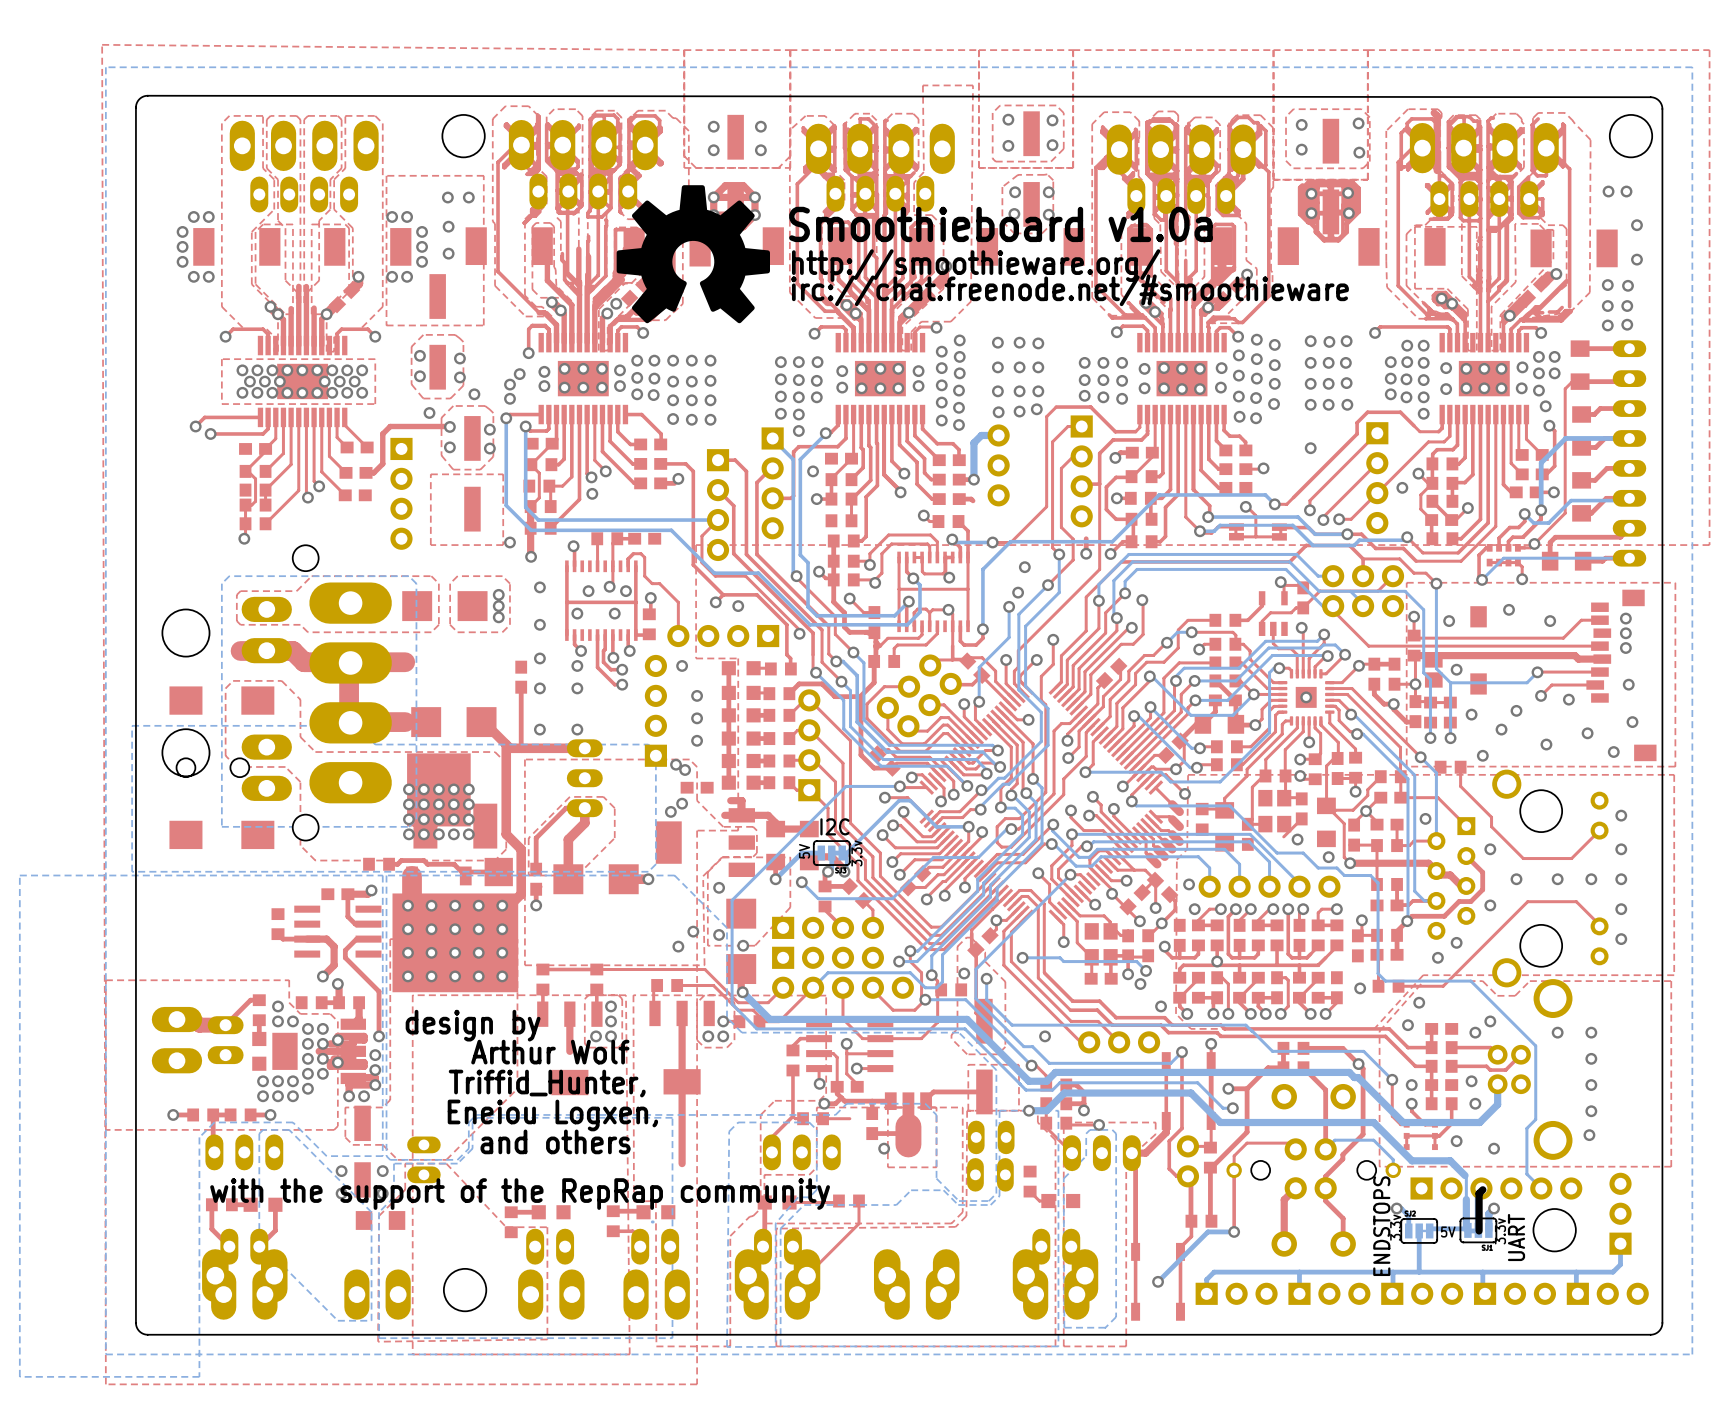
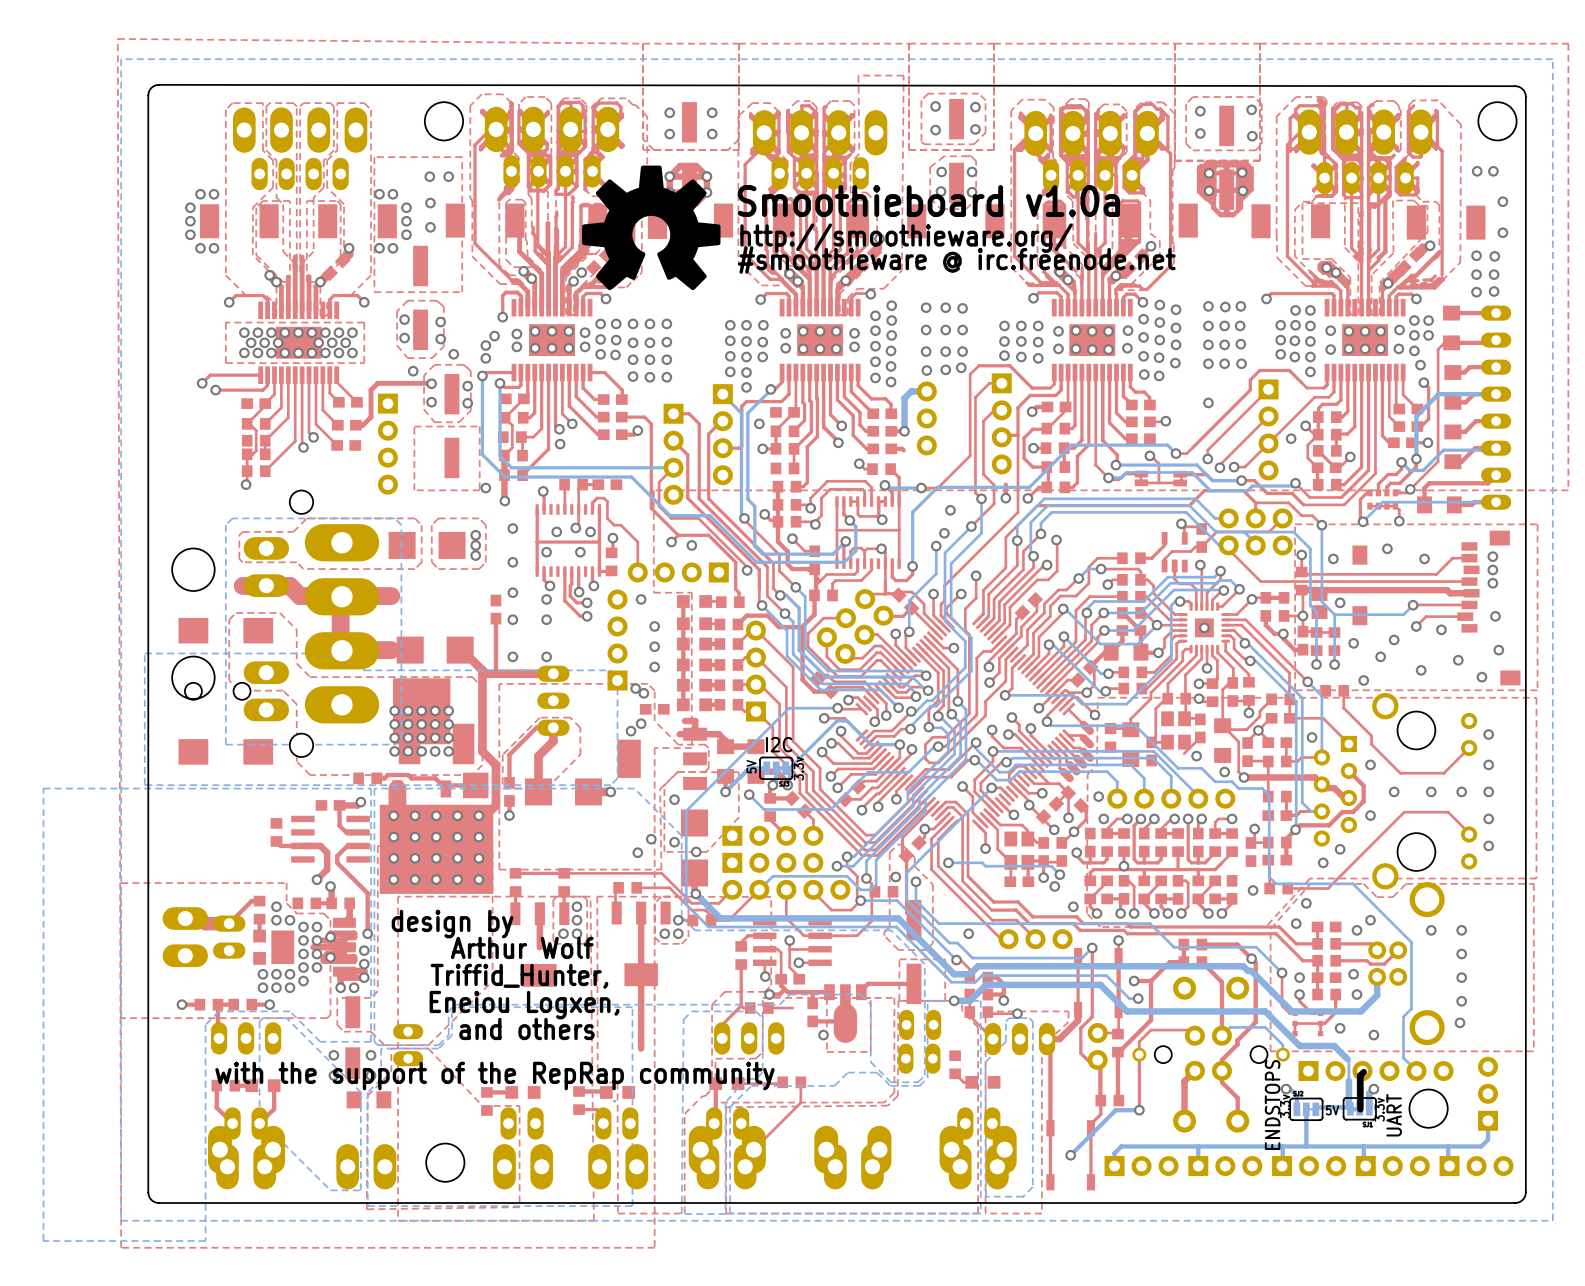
text: irc://chat.freenode.net/#smoothieware (1069, 290) -> #smoothieware @ irc.freenode.net (956, 259)

